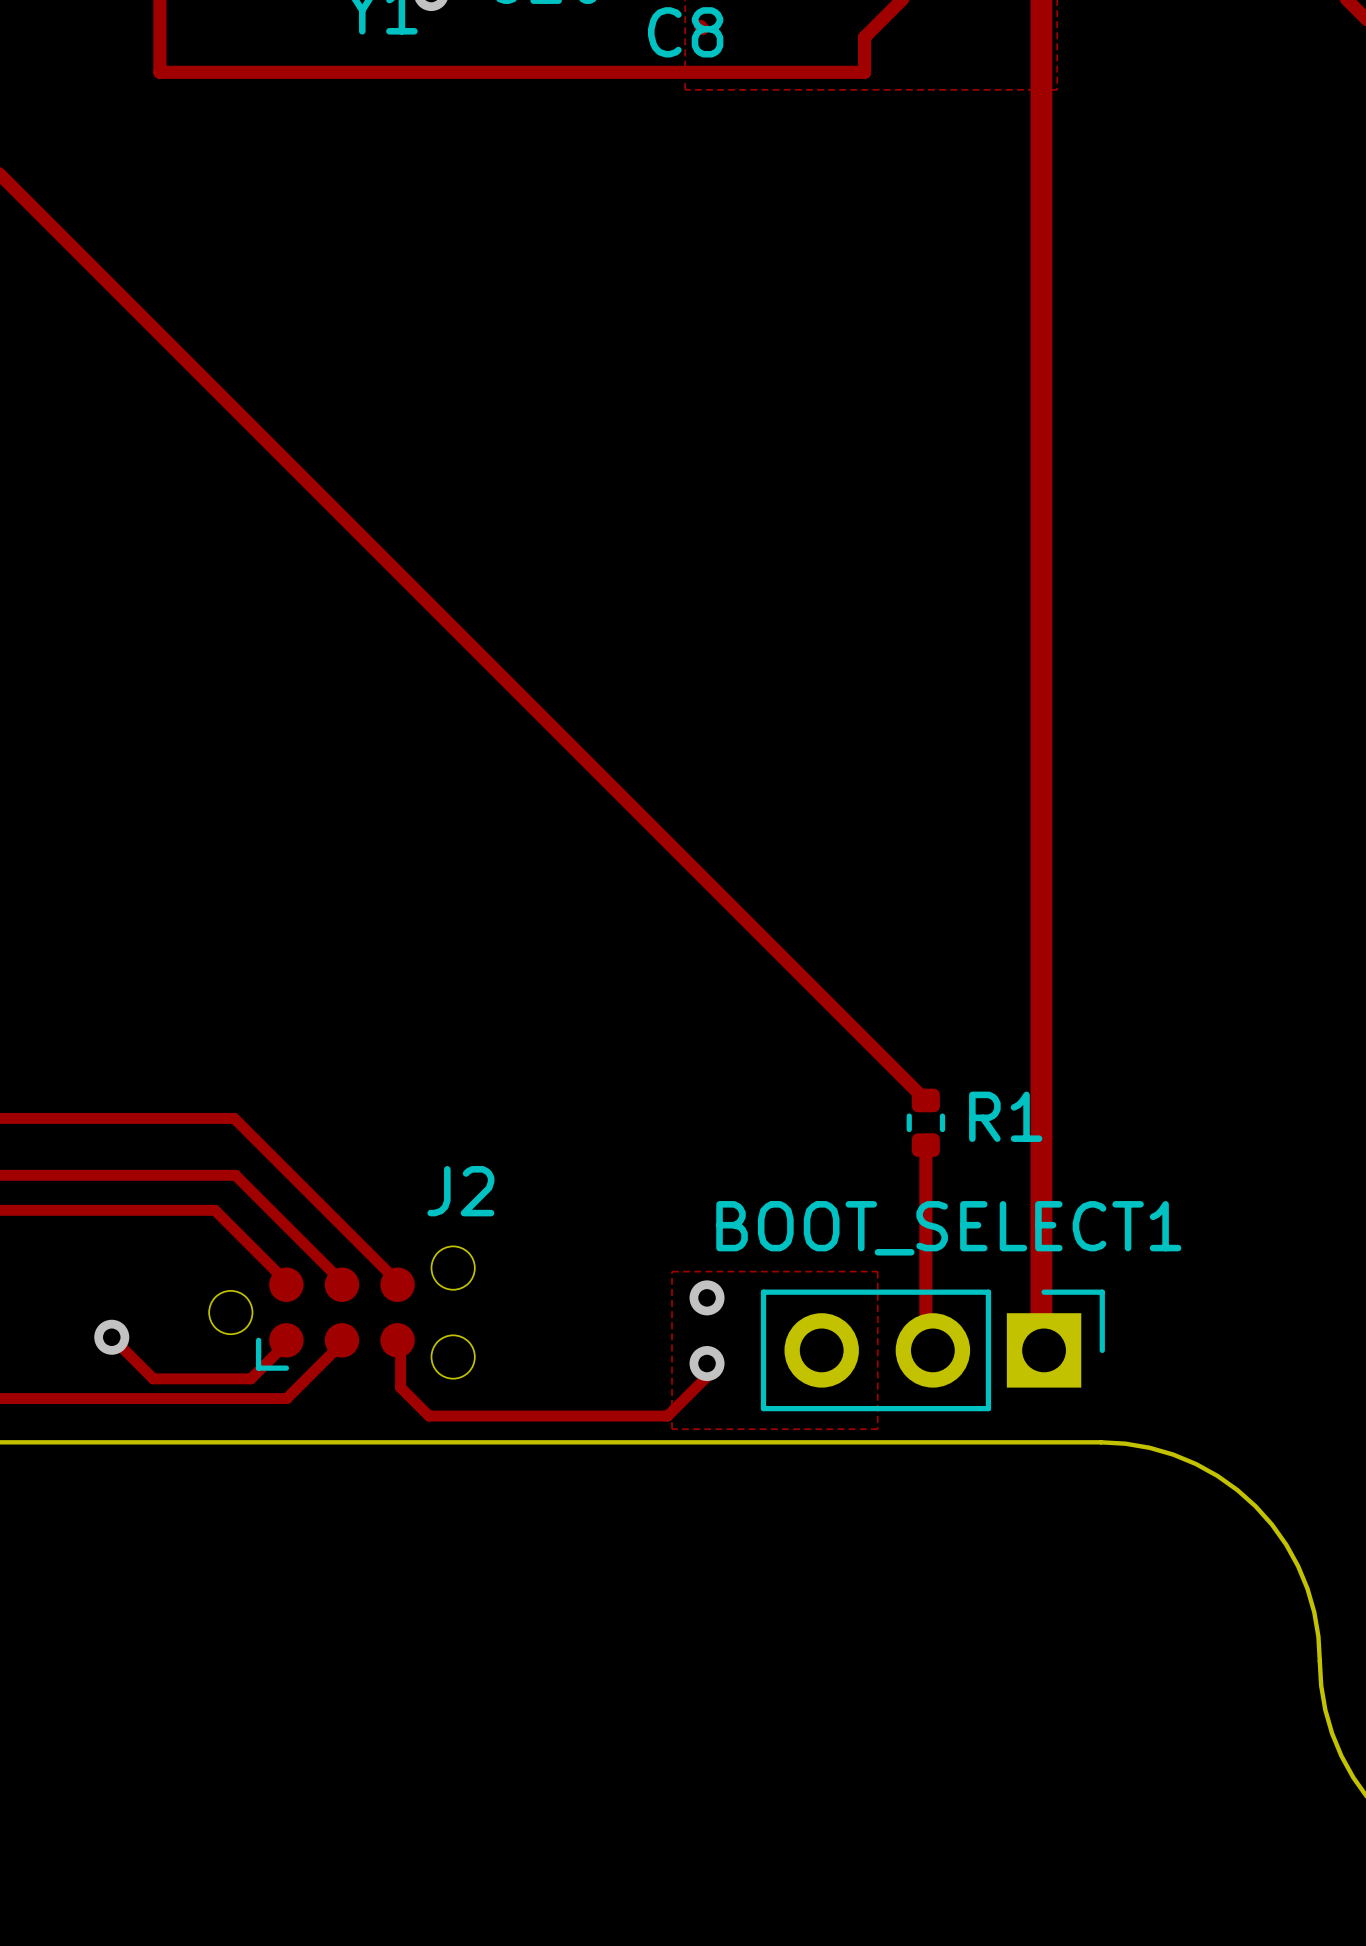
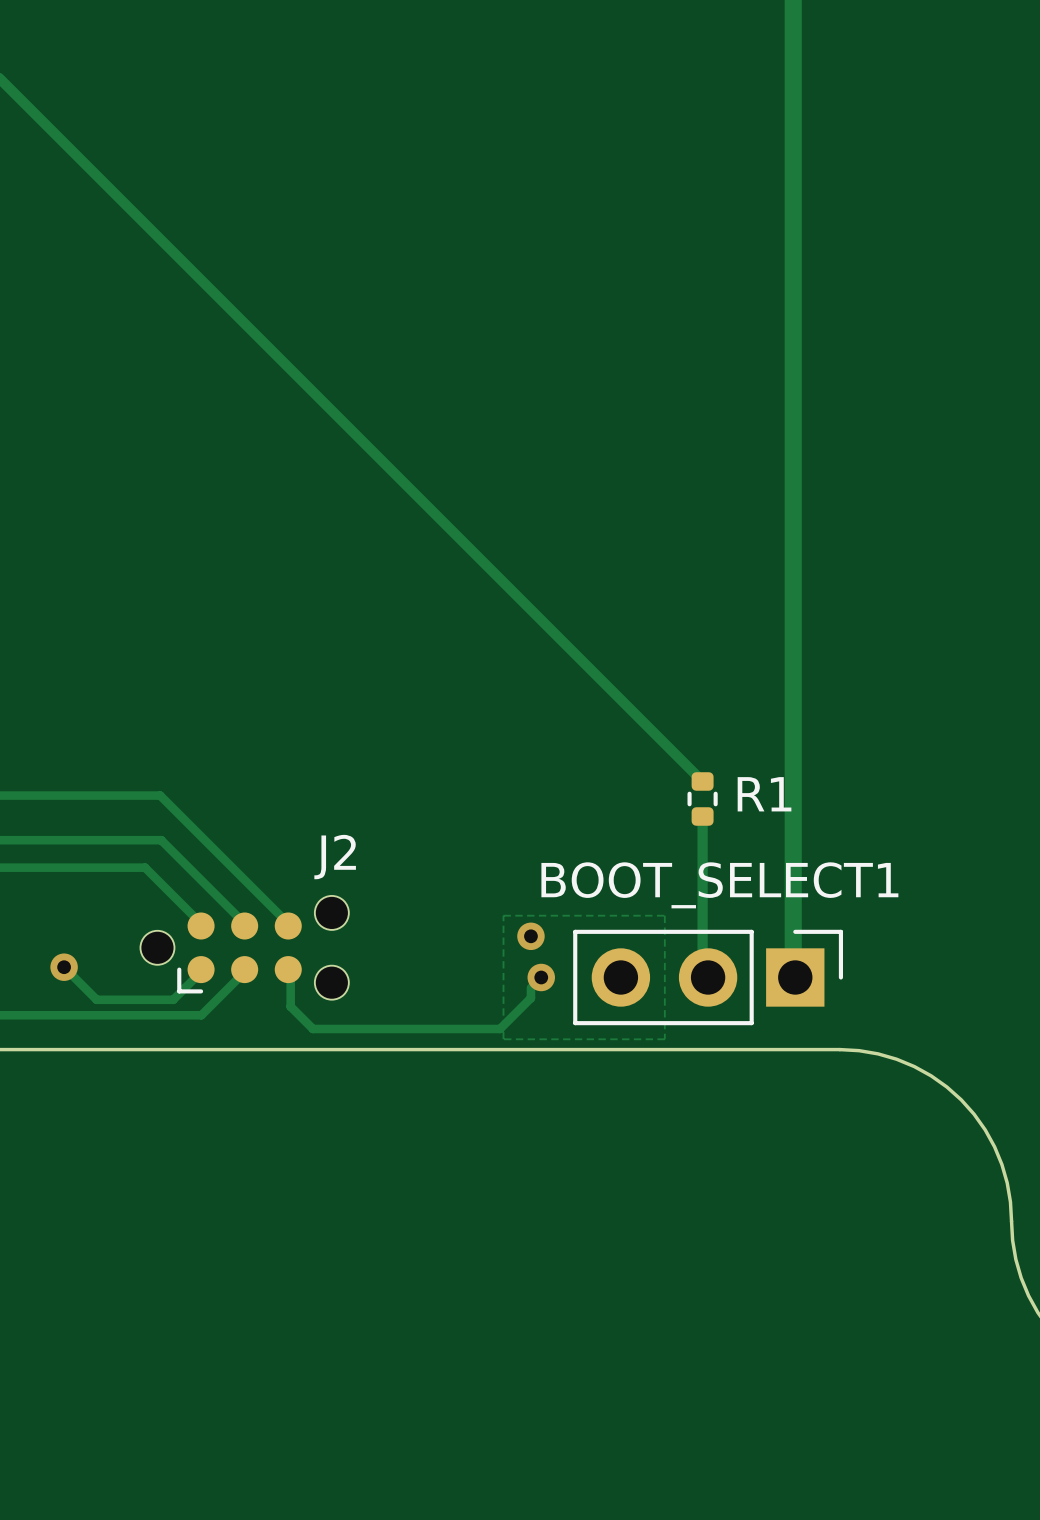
via position: (707, 1363) -> (541, 977)

